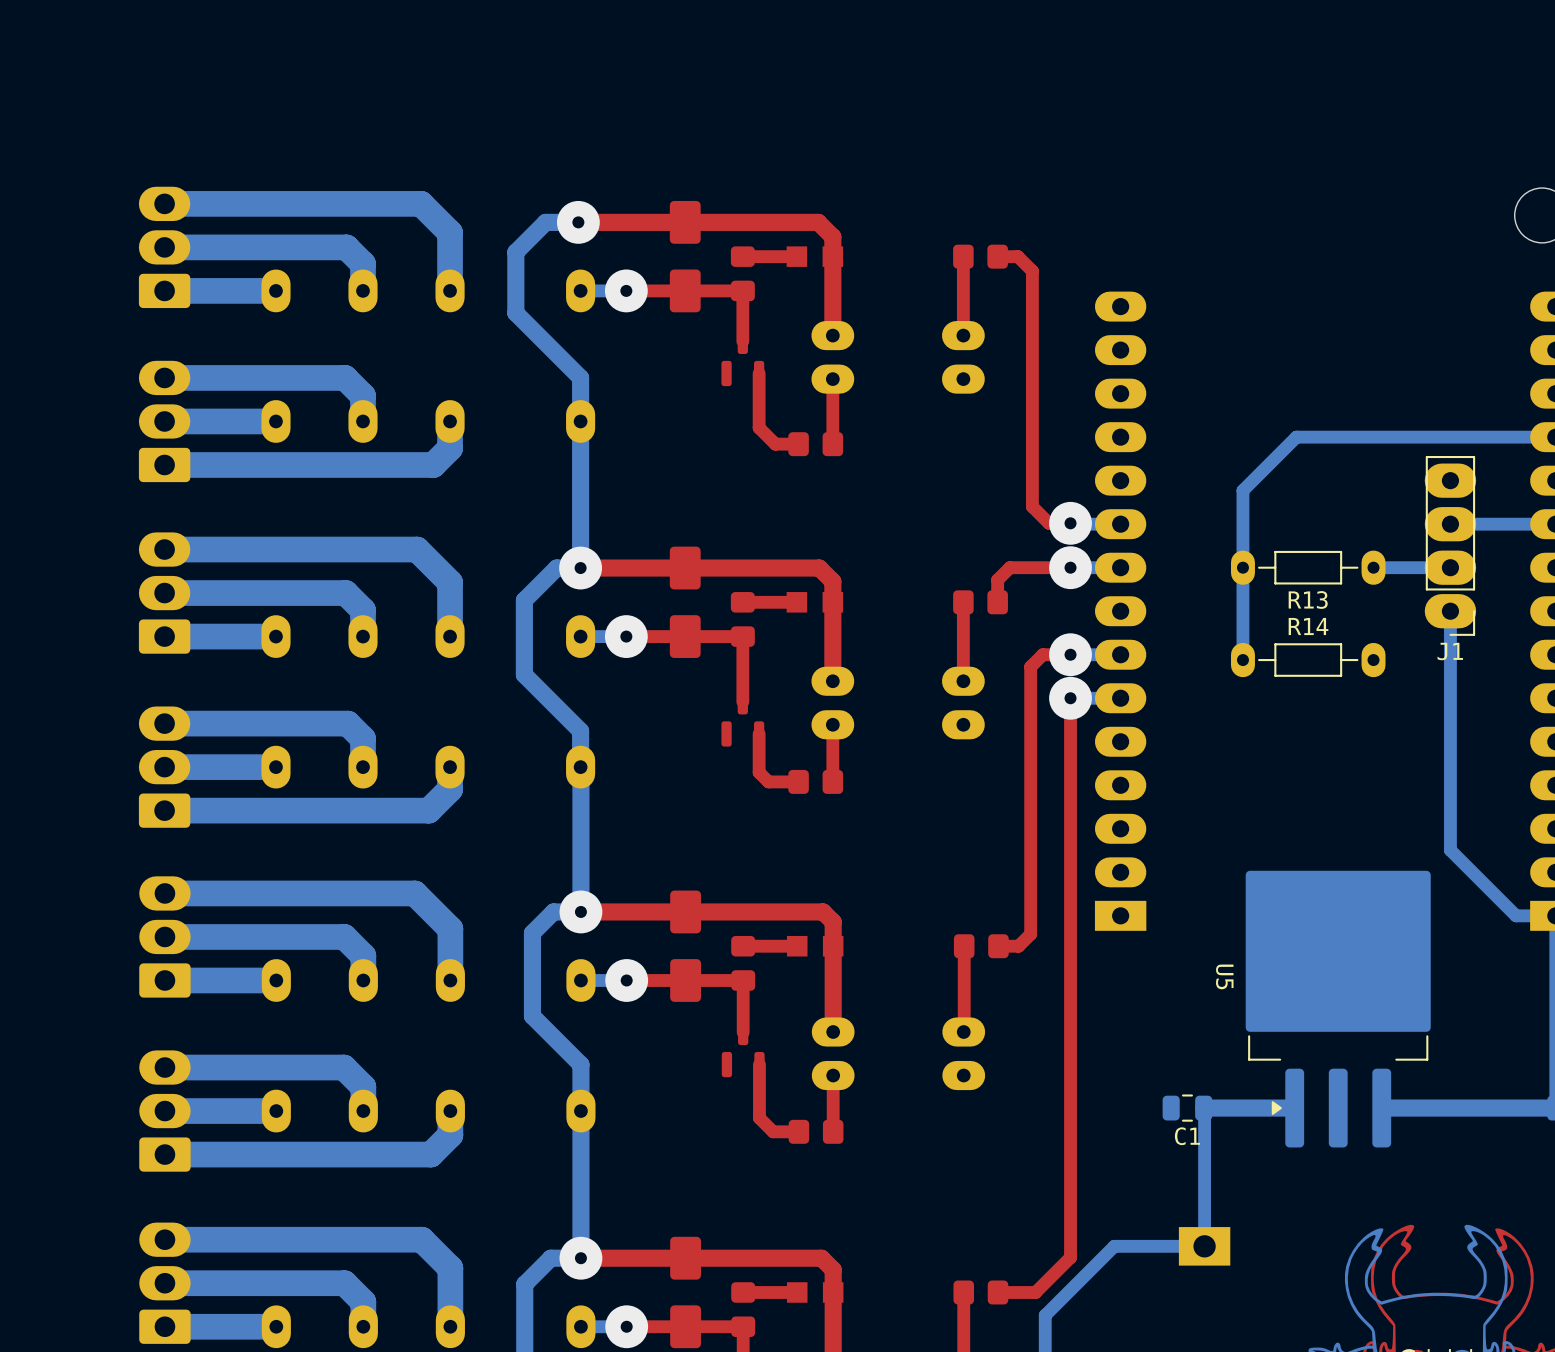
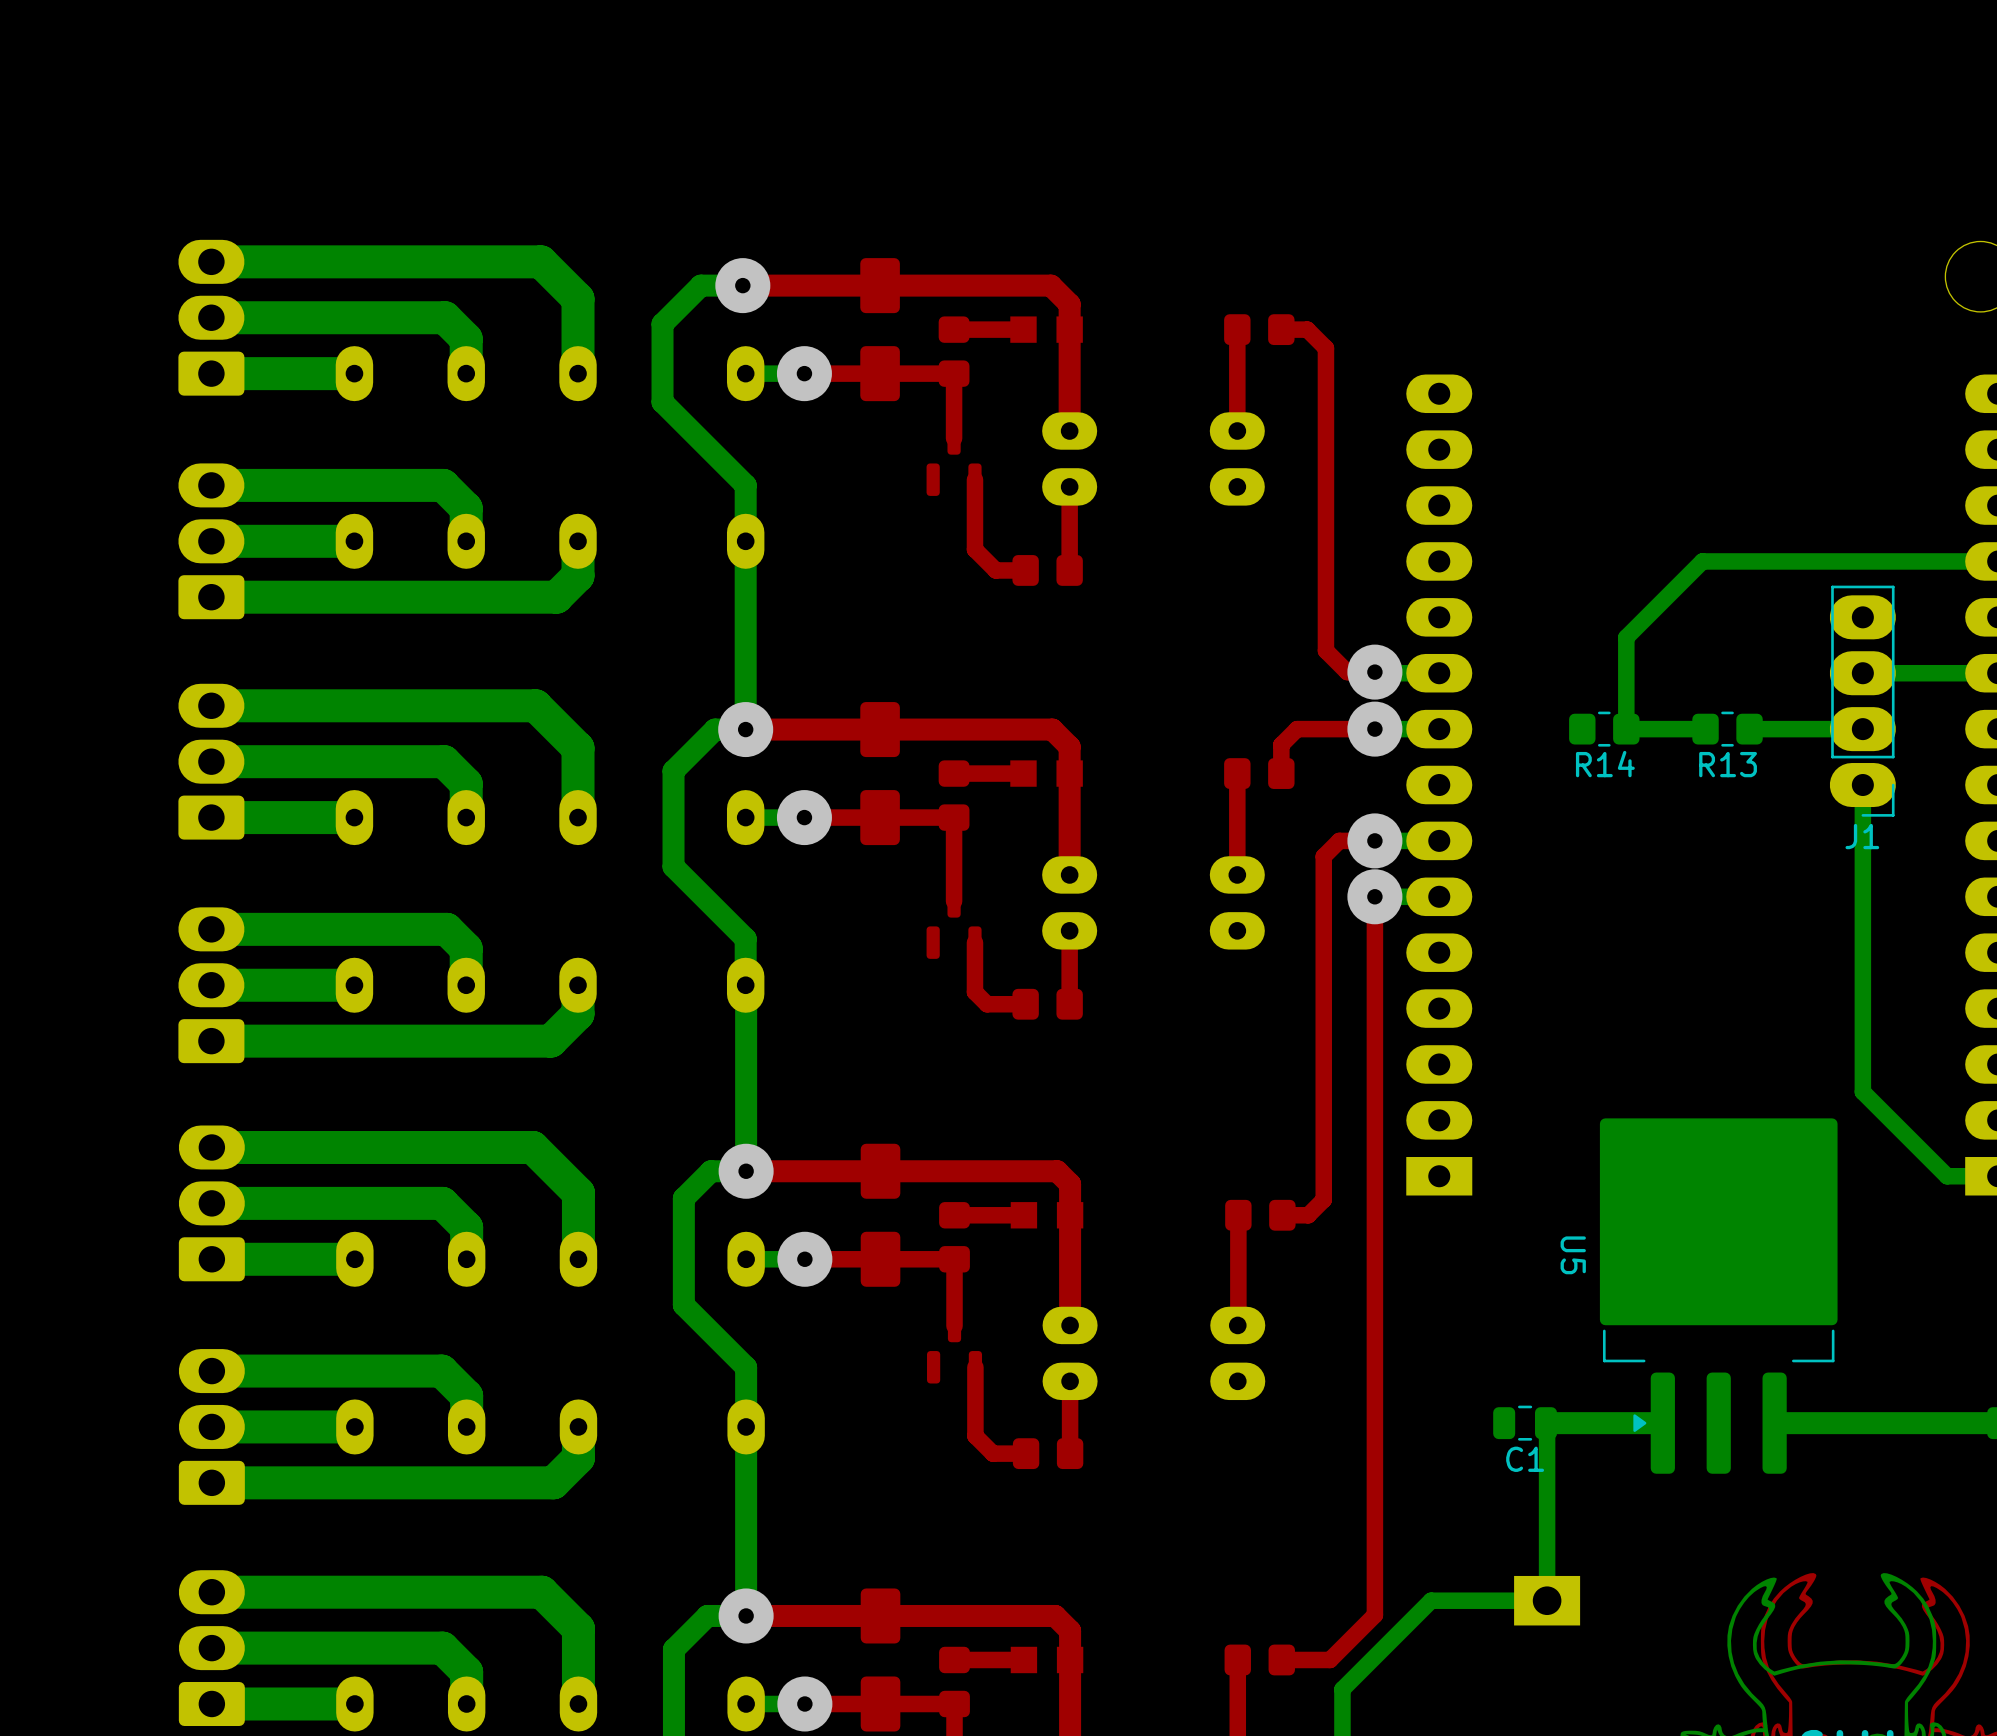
bottom track: (1325, 437) (1296, 437) (1242, 490) (1242, 660) -> (1702, 561) (1626, 637) (1626, 729) (1705, 729)
R13 footprint: [1230, 550, 1386, 585] -> [1692, 711, 1763, 747]
R14 name position: R14 (1308, 626) -> R14 (1605, 764)
R14 footprint: [1230, 642, 1386, 678] -> [1569, 711, 1640, 747]

